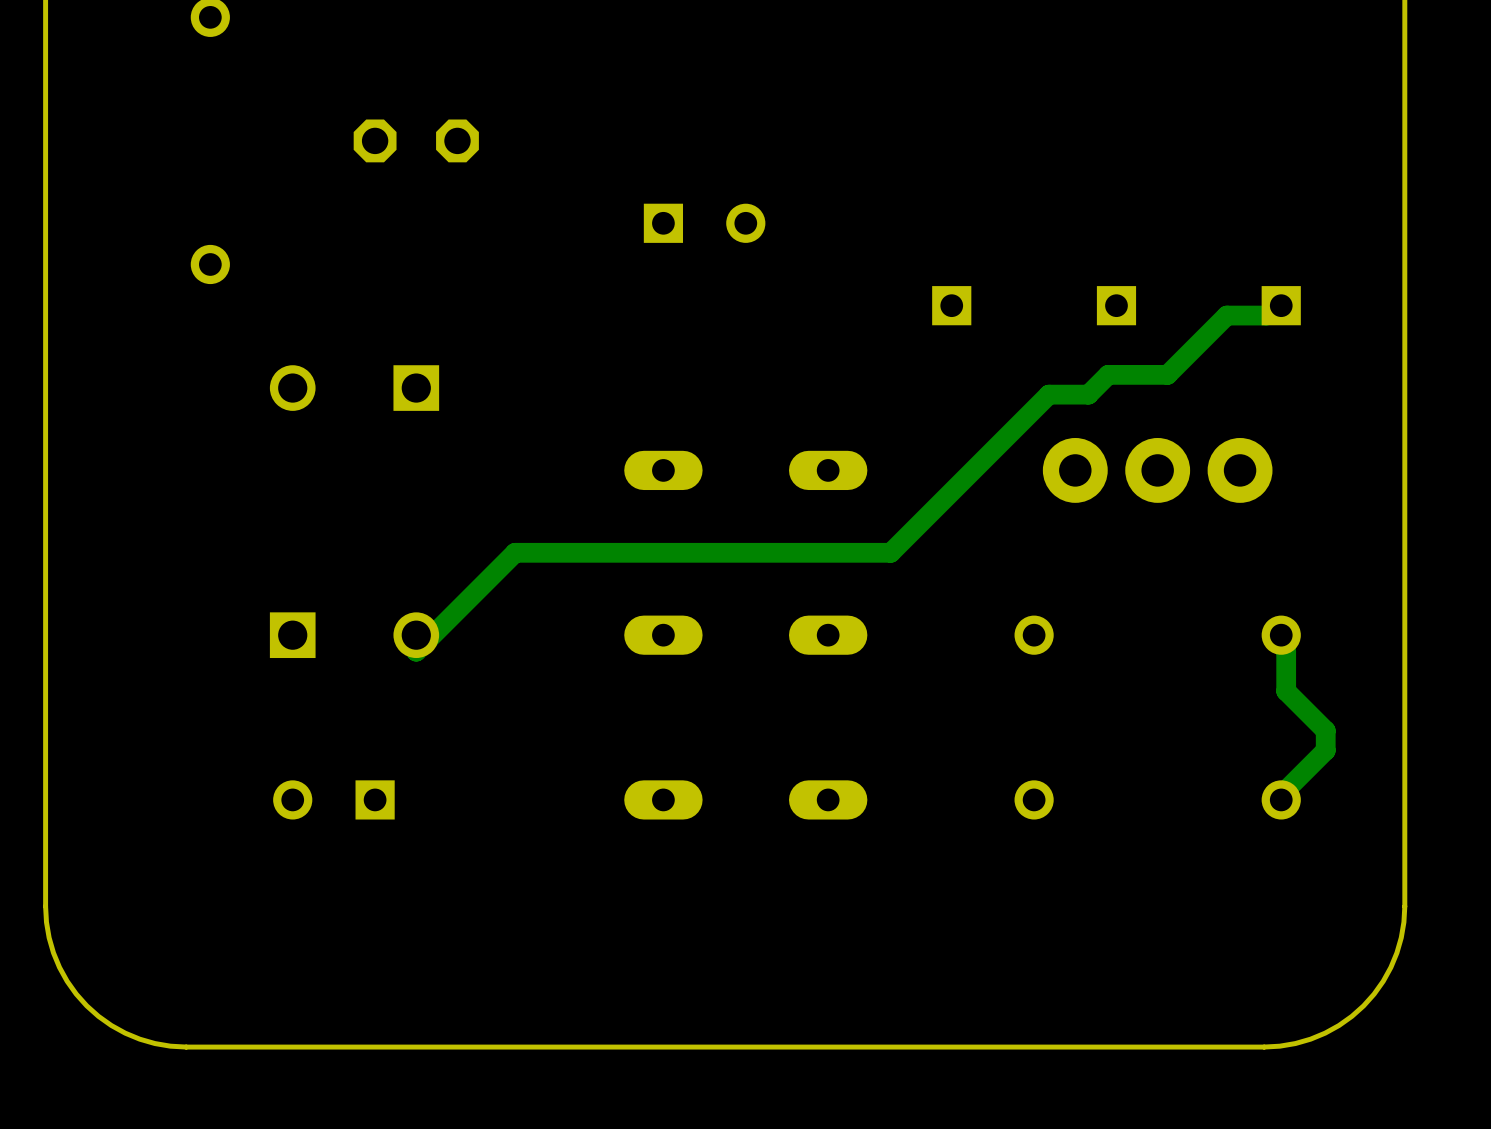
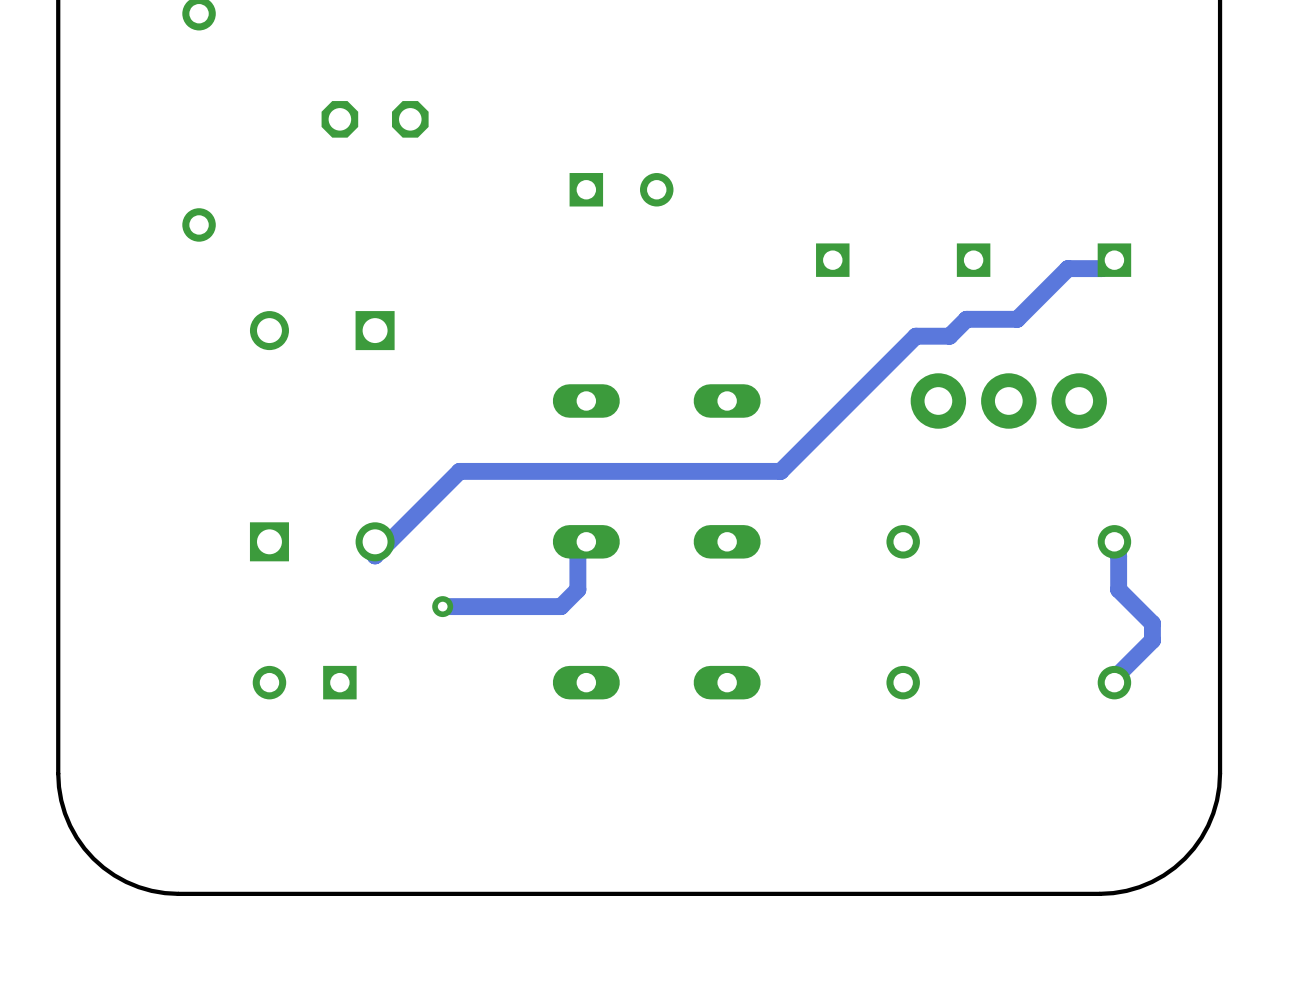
track: none -> (586, 541) (577, 555) (577, 589) (560, 606) (442, 606)
via: none -> (442, 606)

